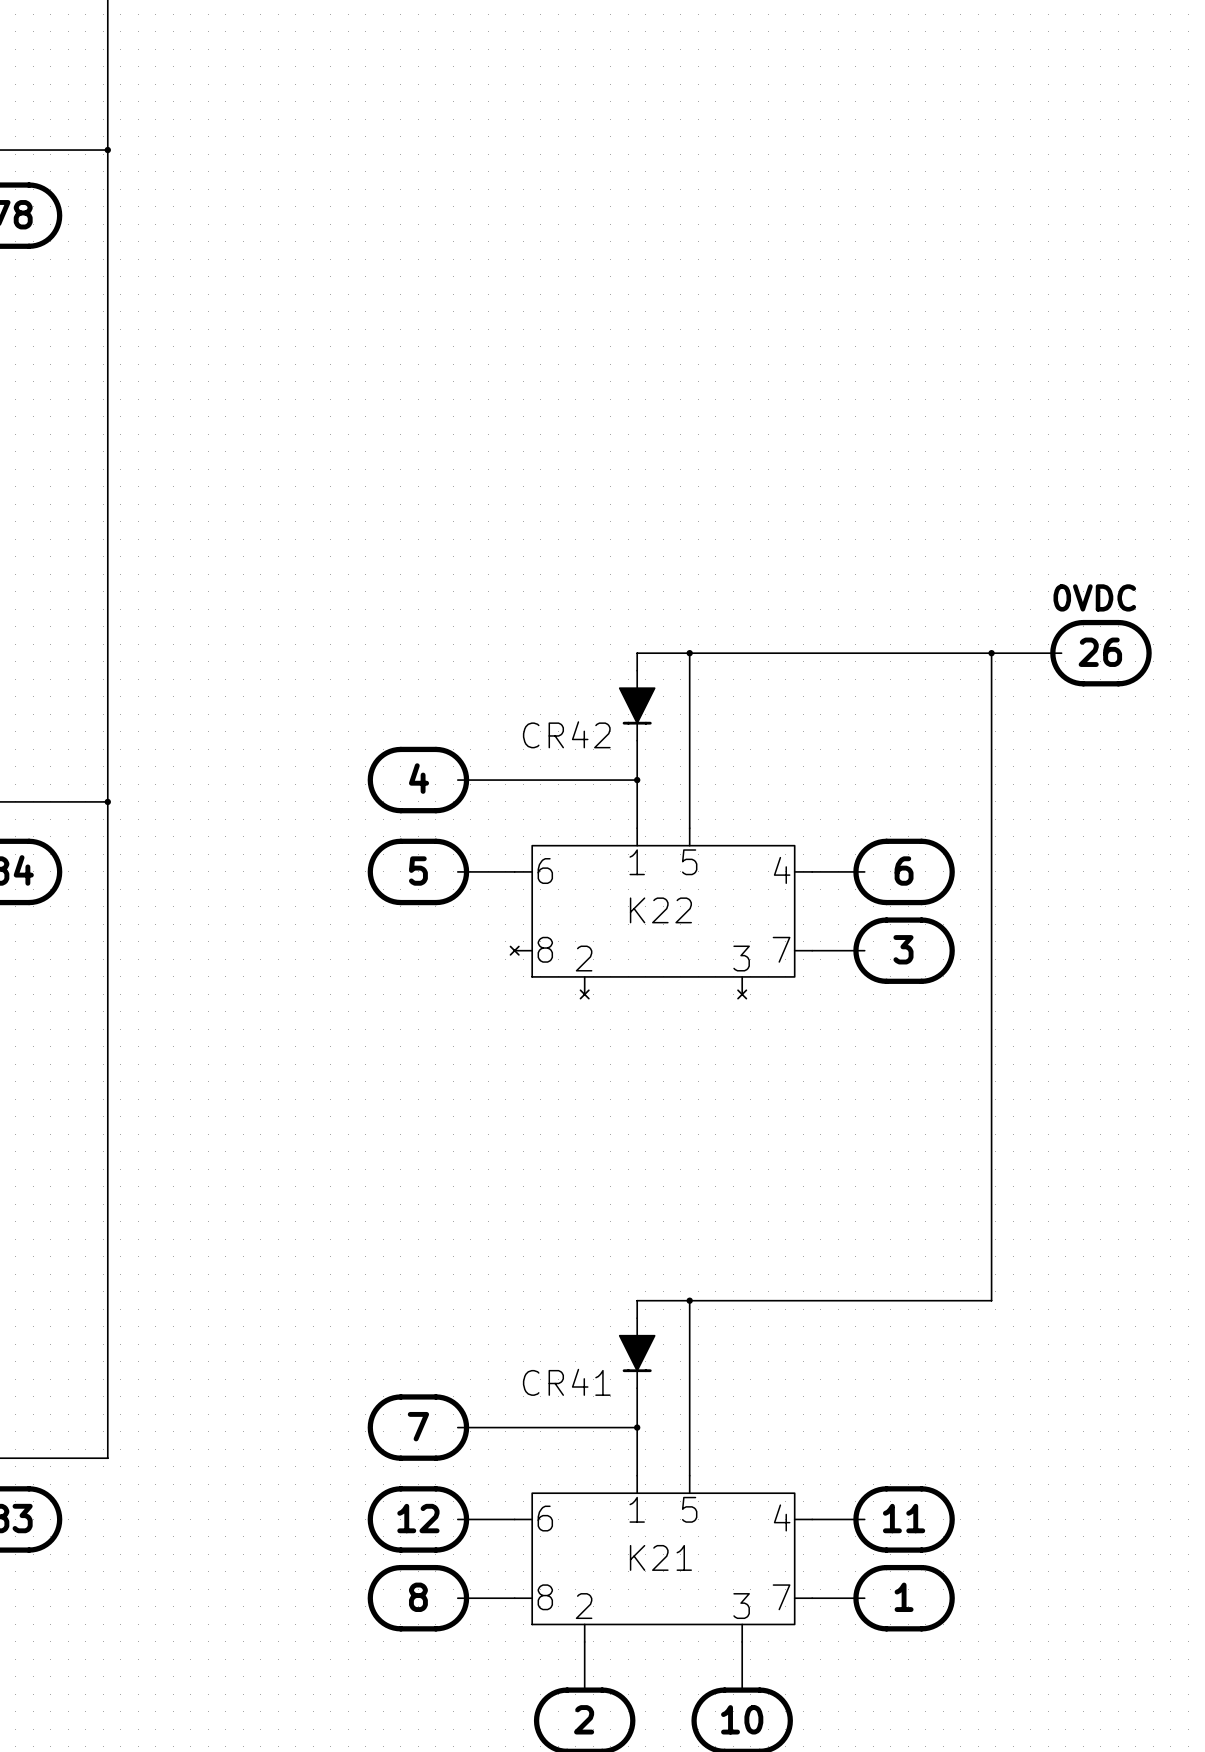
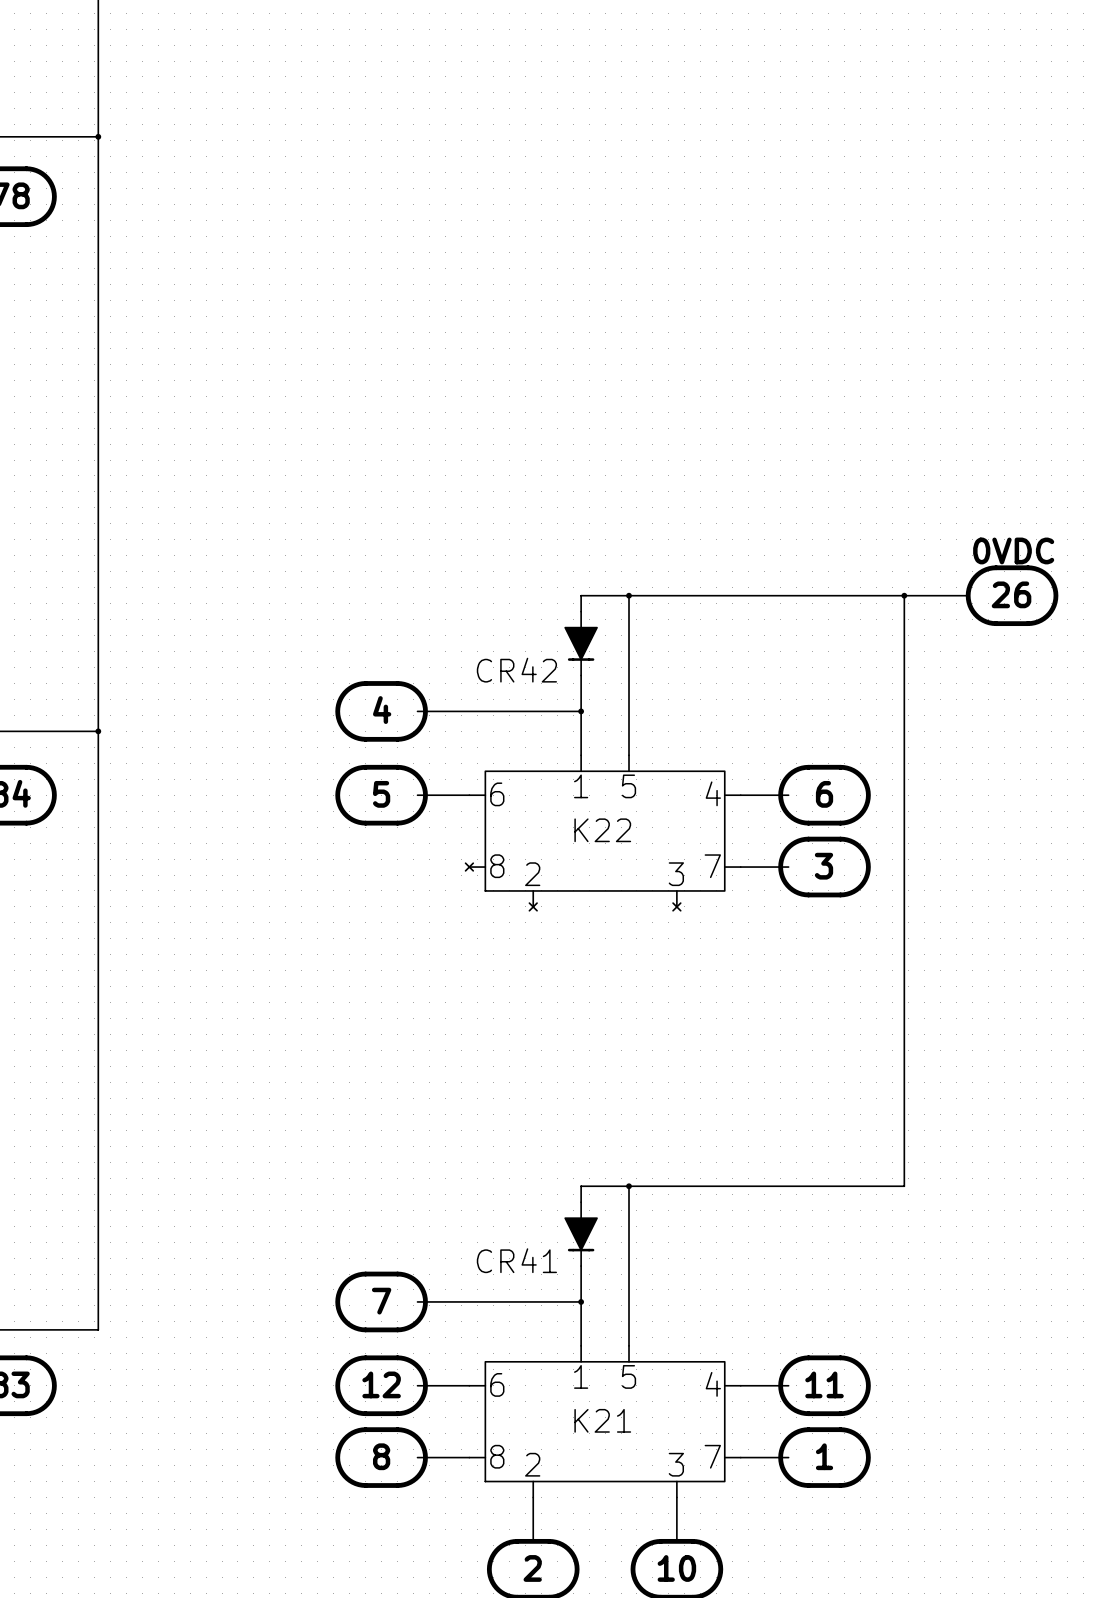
text: 0VDC (1094, 597) -> none
part: (1100, 653) -> none
part: none -> (1012, 595)

